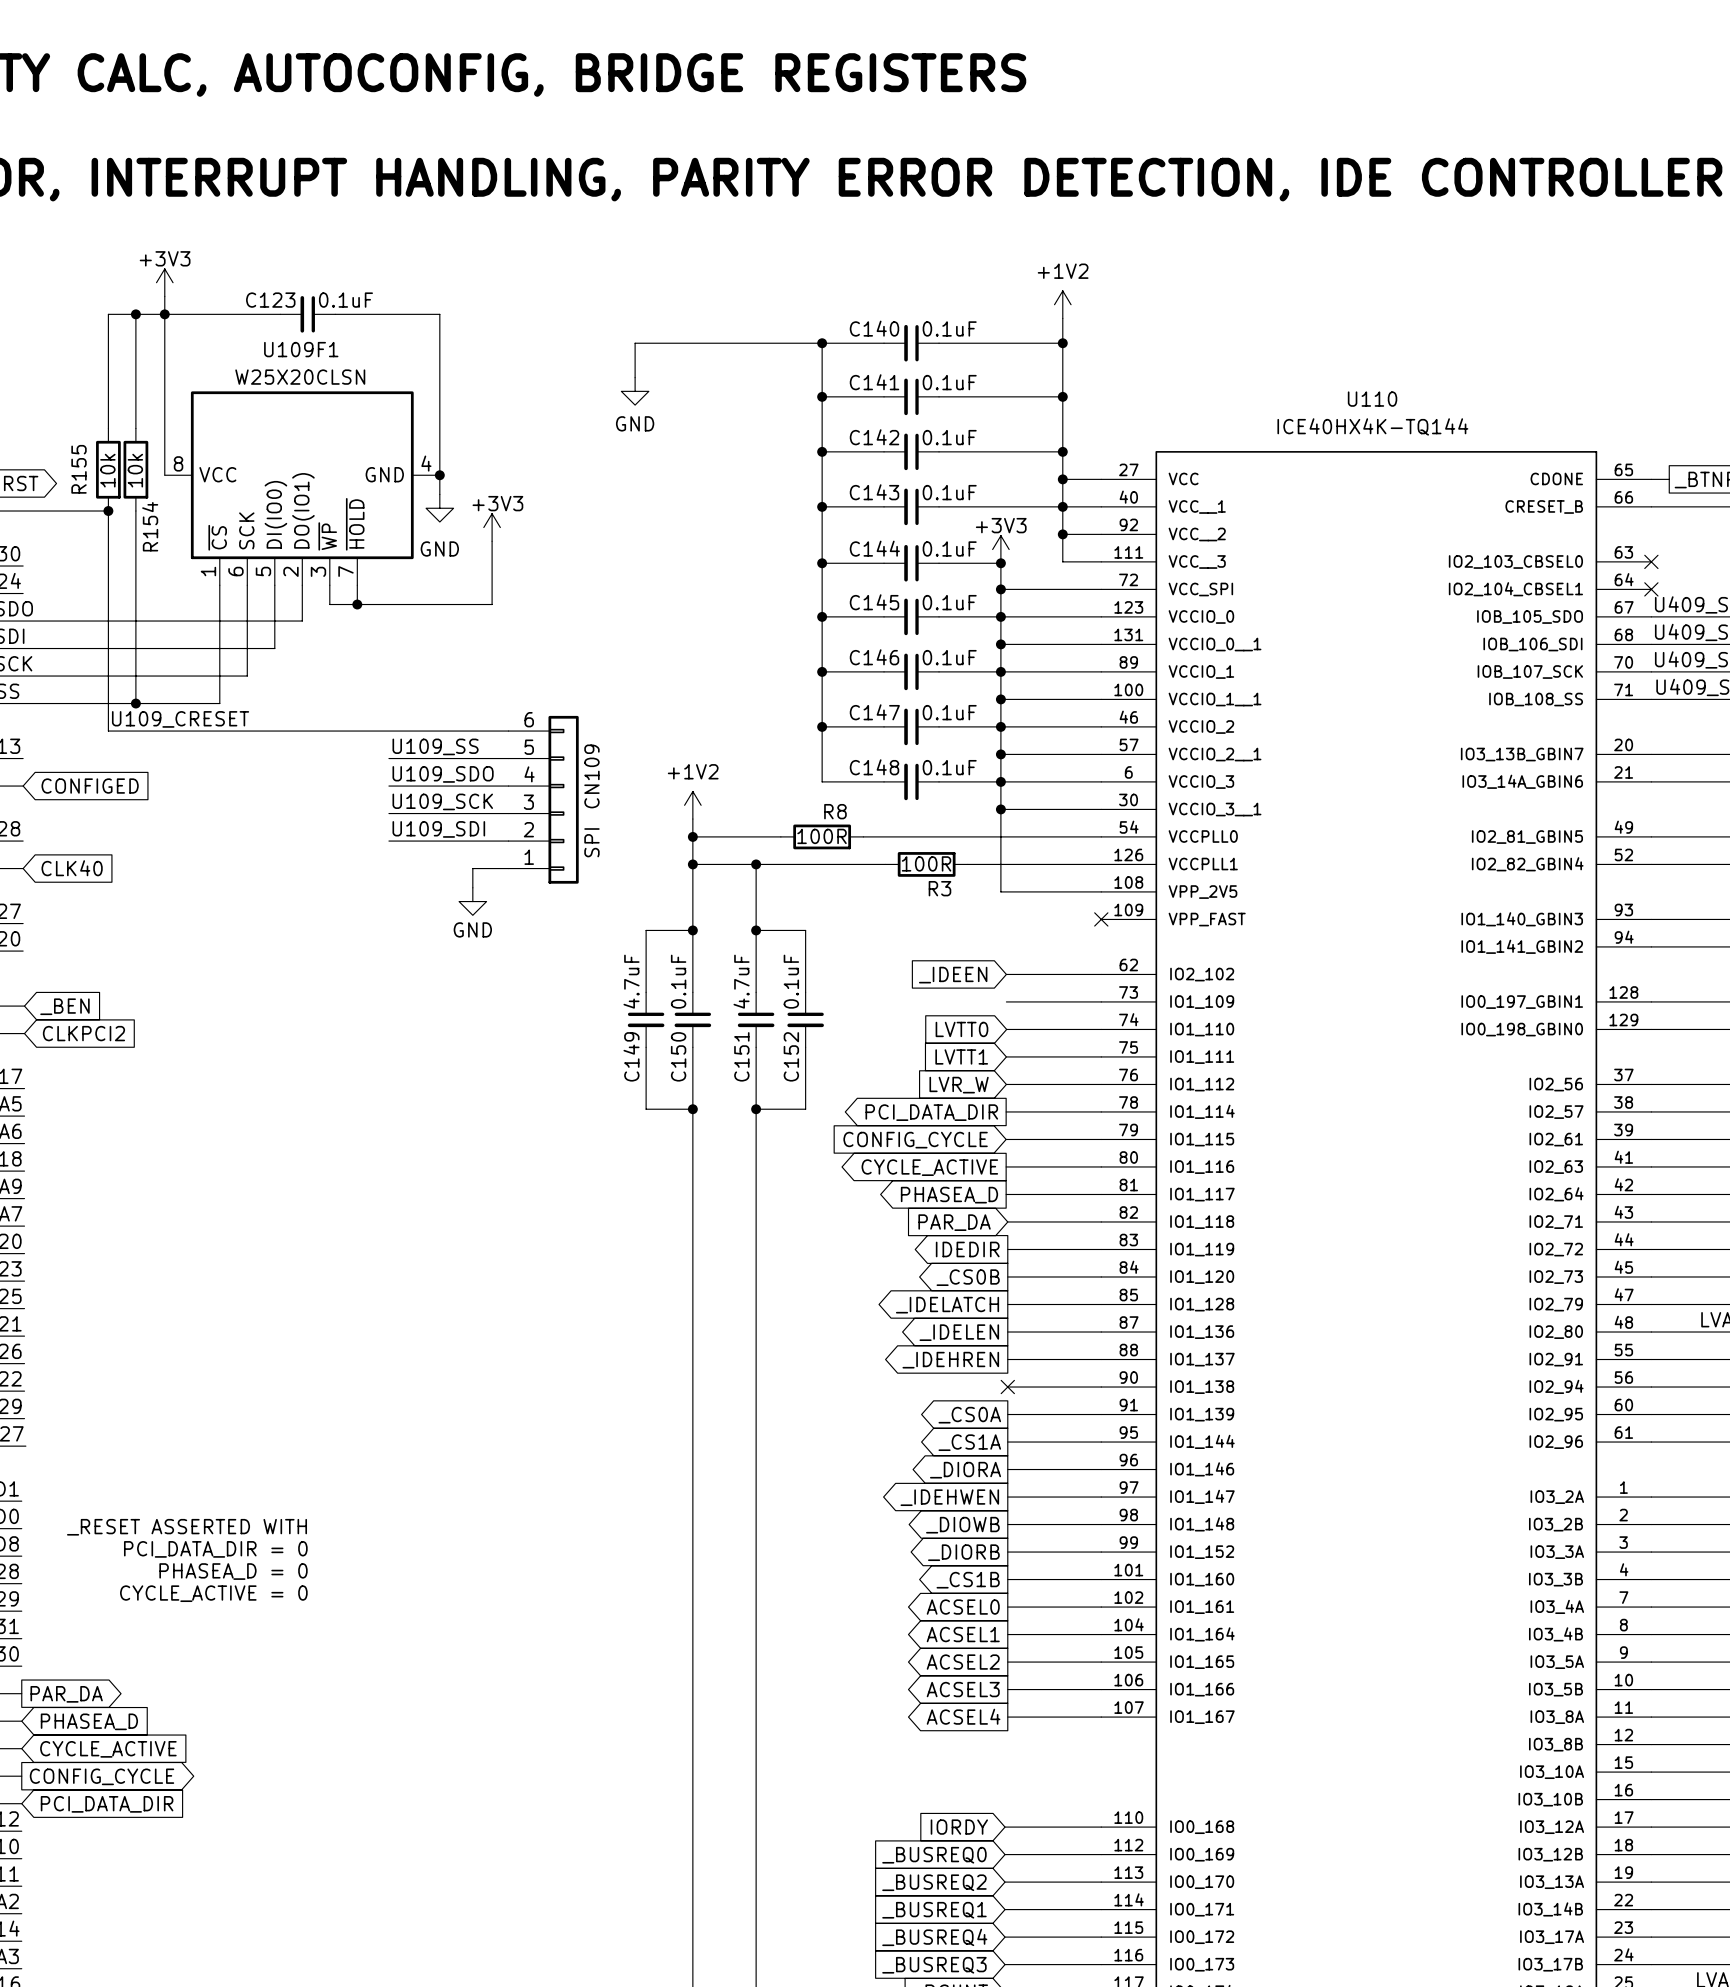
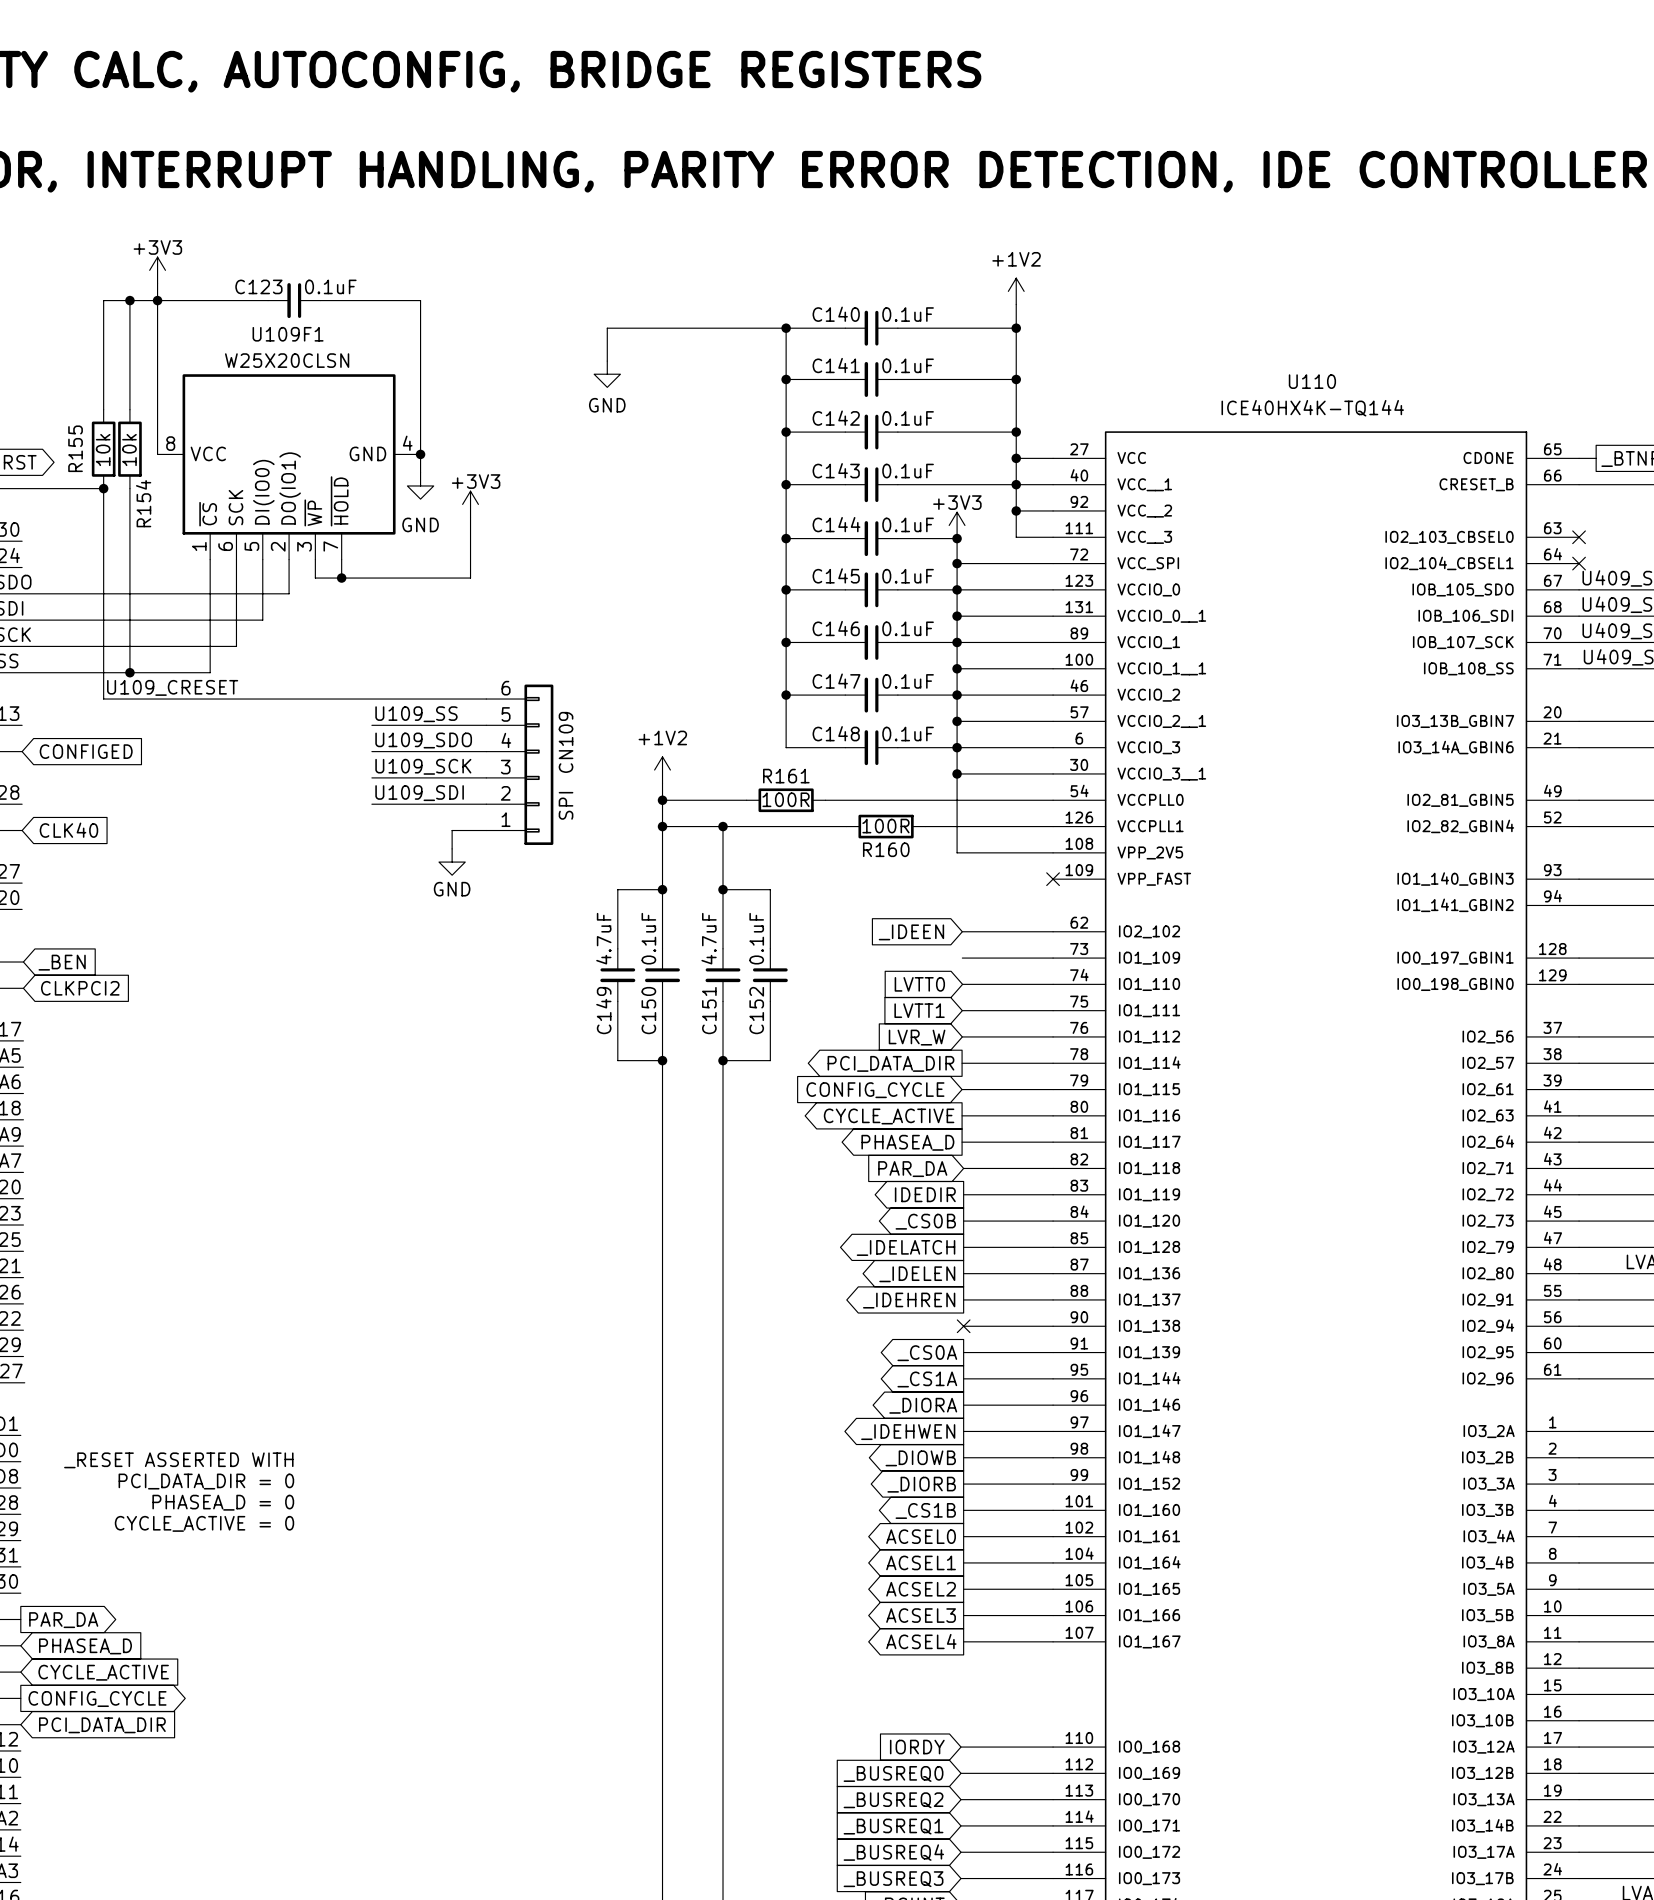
R8 name: R8 (835, 811) -> R161 (786, 776)
R3 name: R3 (939, 888) -> R160 (886, 849)

